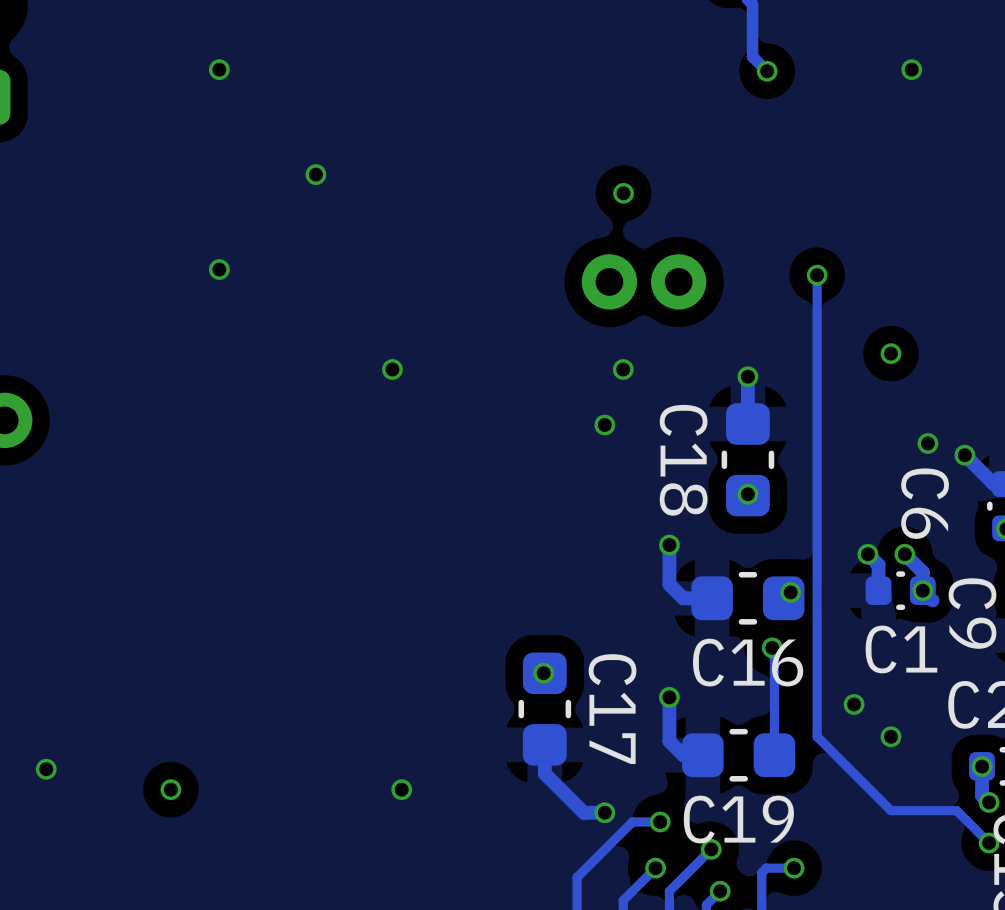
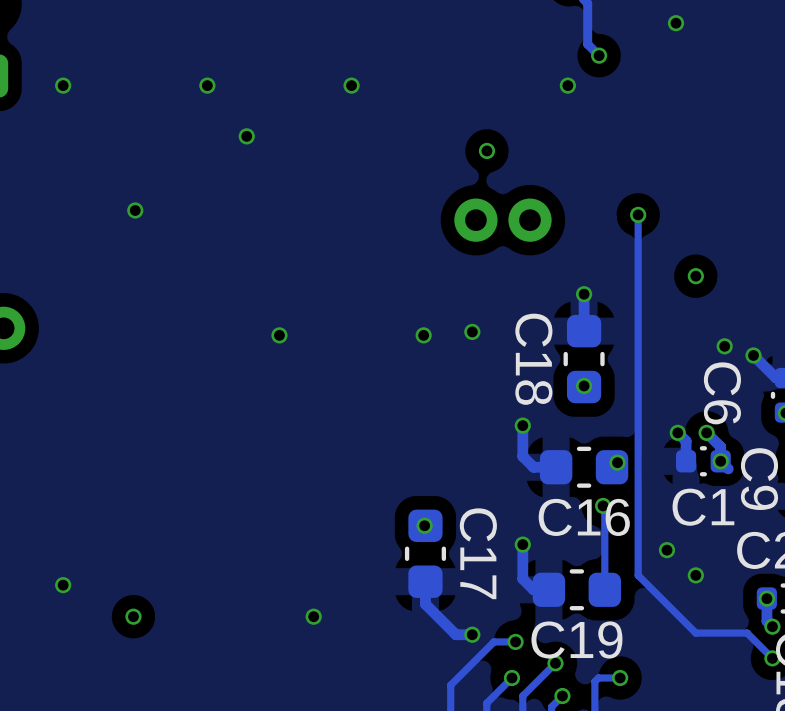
via position: (219, 69) -> (207, 85)
via position: (911, 69) -> (676, 23)
via: none -> (63, 85)
via: none -> (351, 85)
via: none -> (567, 85)
via position: (219, 269) -> (135, 210)
via position: (392, 369) -> (279, 335)
via: (623, 369) -> none
via: none -> (423, 335)
via position: (46, 769) -> (63, 585)

